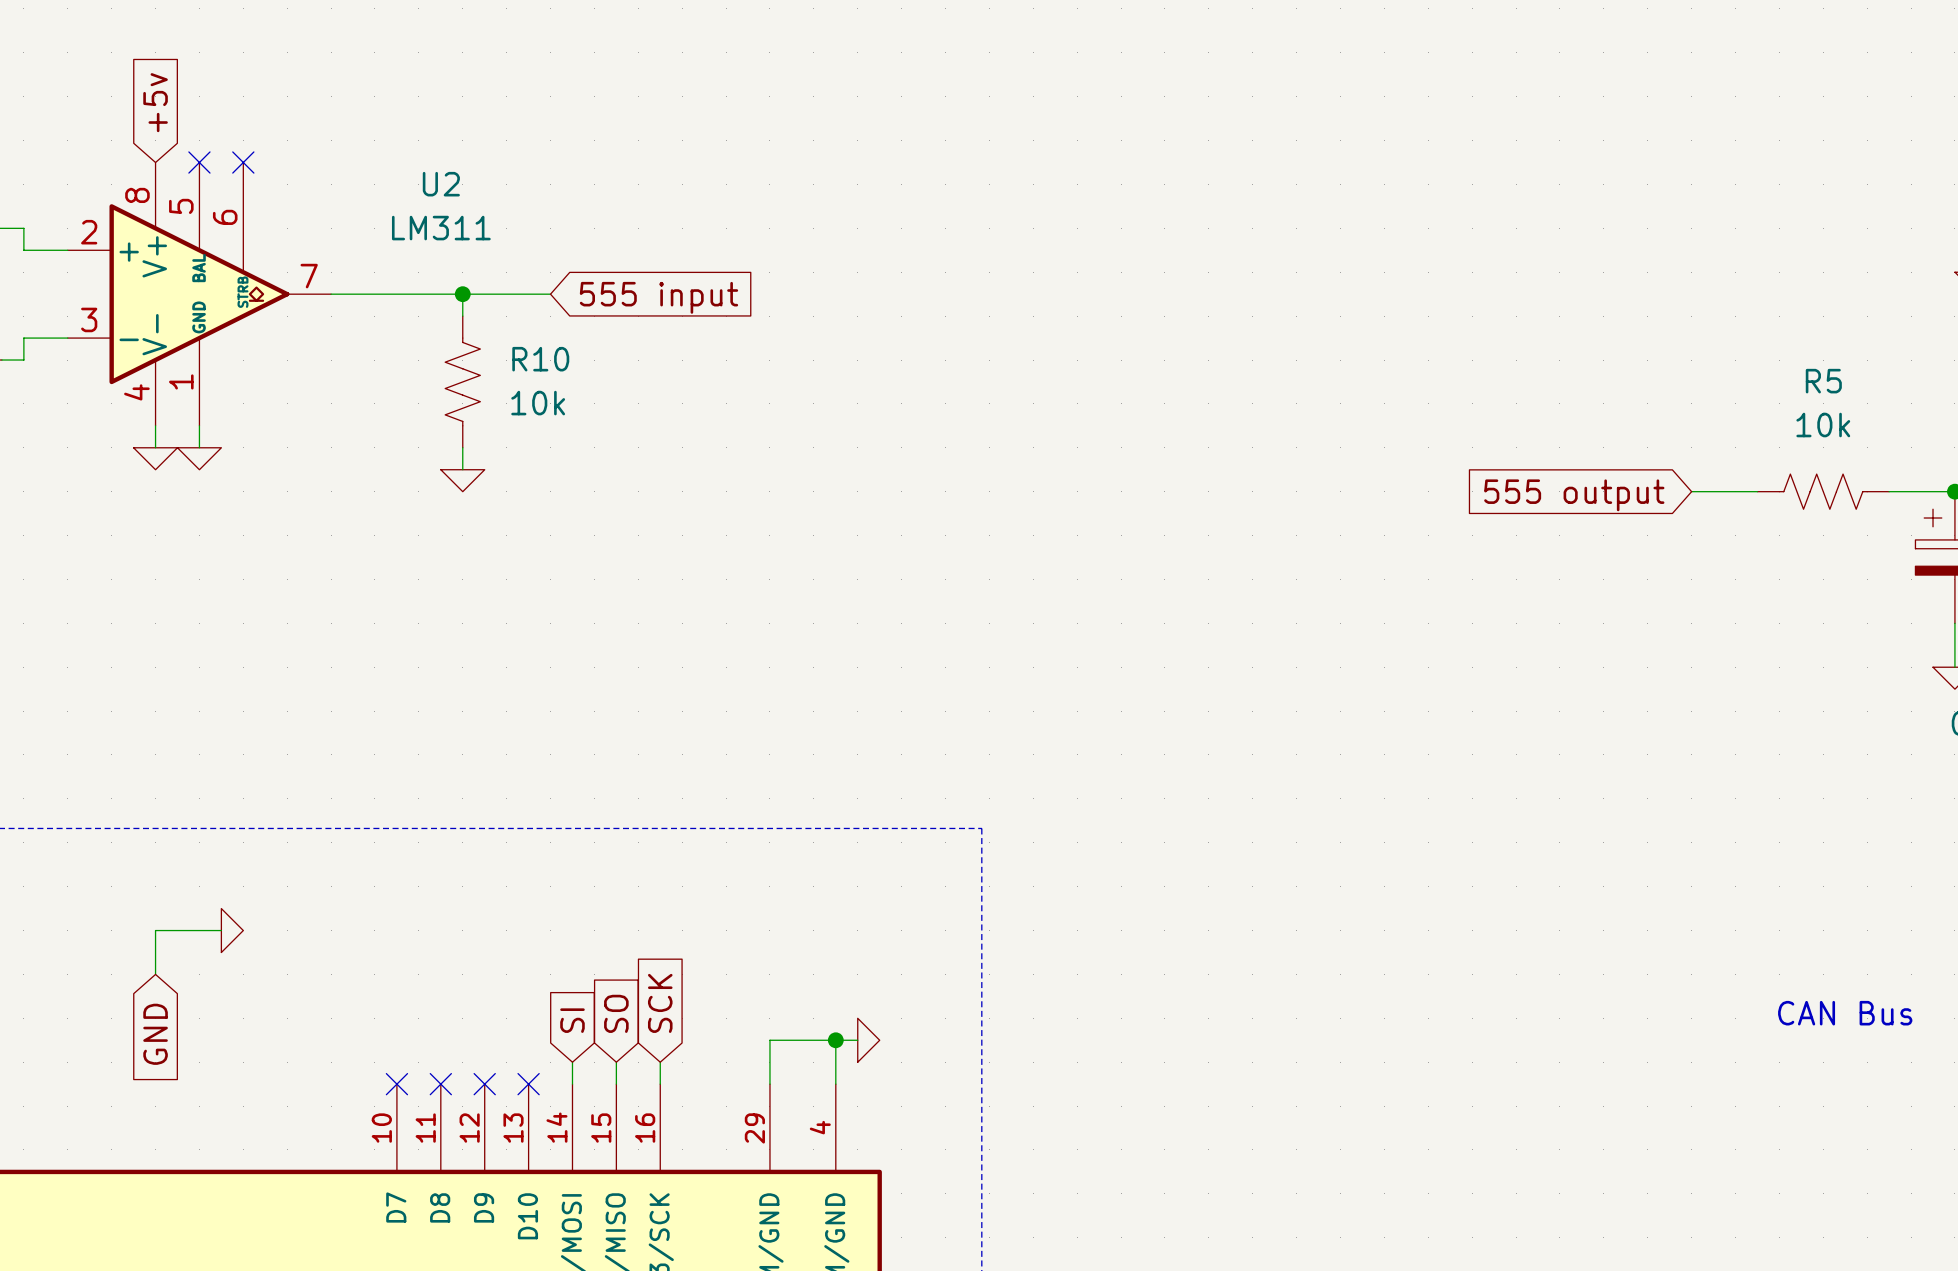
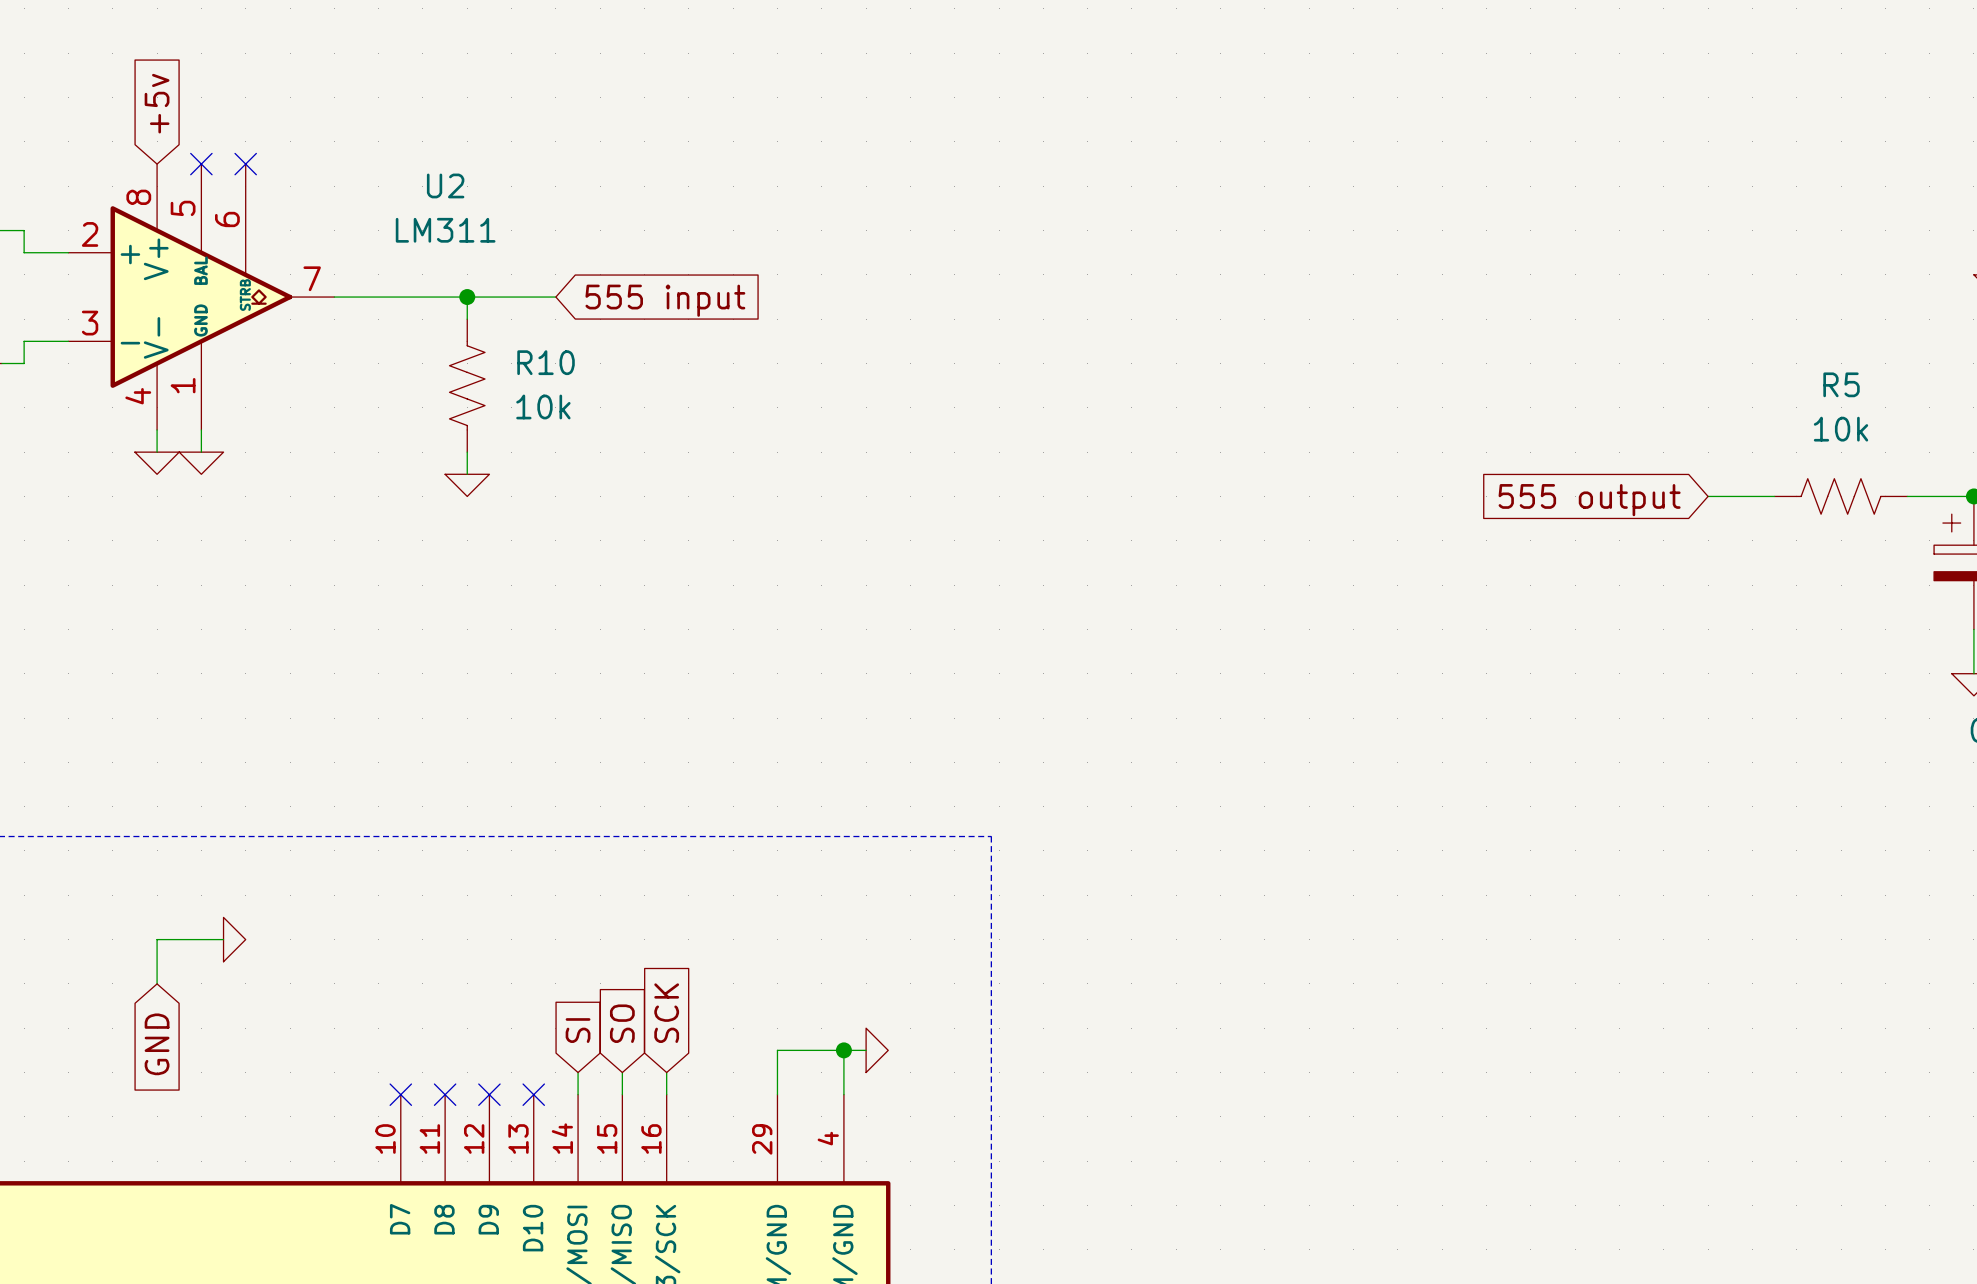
text: CAN Bus (1845, 1013) -> none

